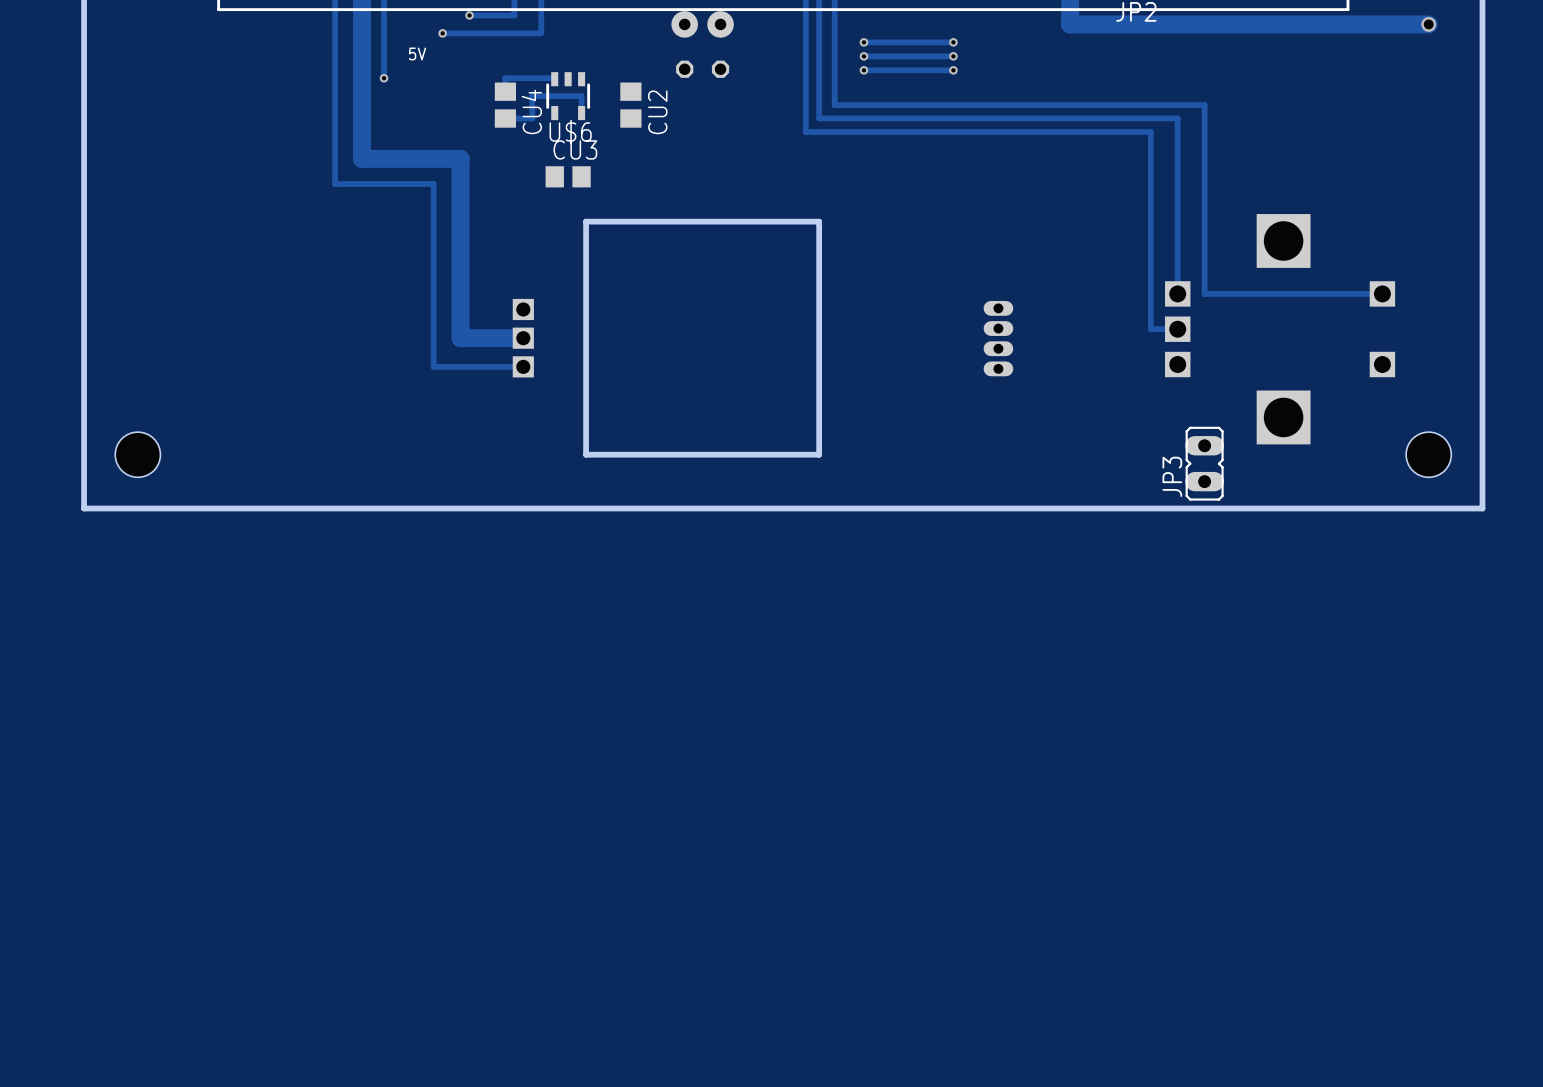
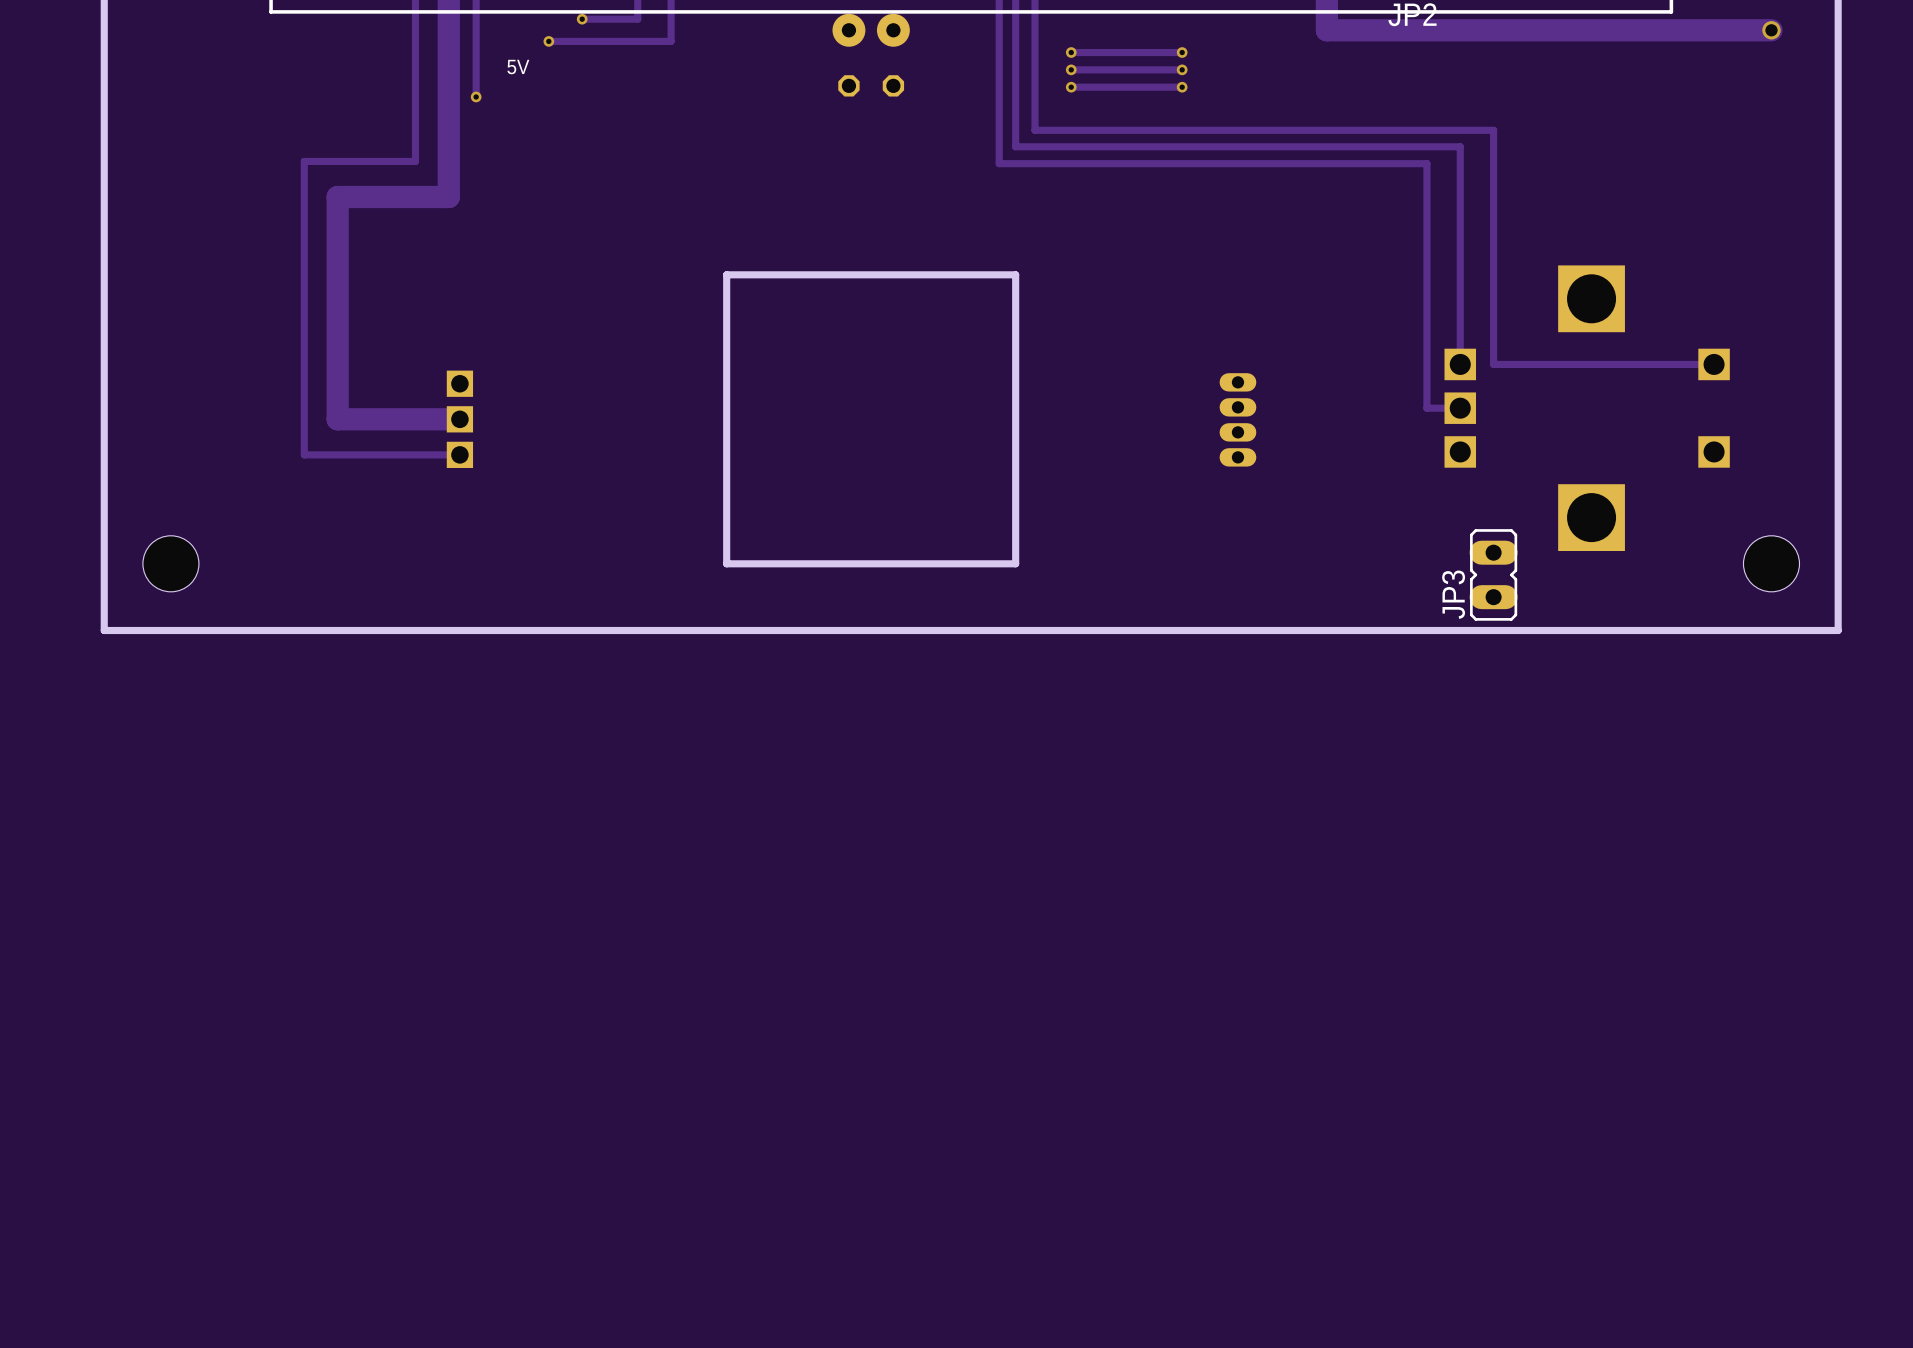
track: (554, 79) (505, 78) (505, 91) -> none
U$6: (568, 96) -> none
CU4: (505, 105) -> none
CU2: (630, 105) -> none
track: (581, 113) (581, 96) (532, 96) (532, 118) (505, 118) -> none
track: (335, 130) (335, 183) (433, 183) (433, 366) (523, 366) -> (415, 161) (304, 161) (304, 454) (459, 454)
track: (361, 158) (460, 158) (460, 338) (523, 338) -> (448, 197) (337, 197) (337, 419) (459, 419)
CU3: (568, 176) -> none
part position: (523, 338) -> (459, 419)

